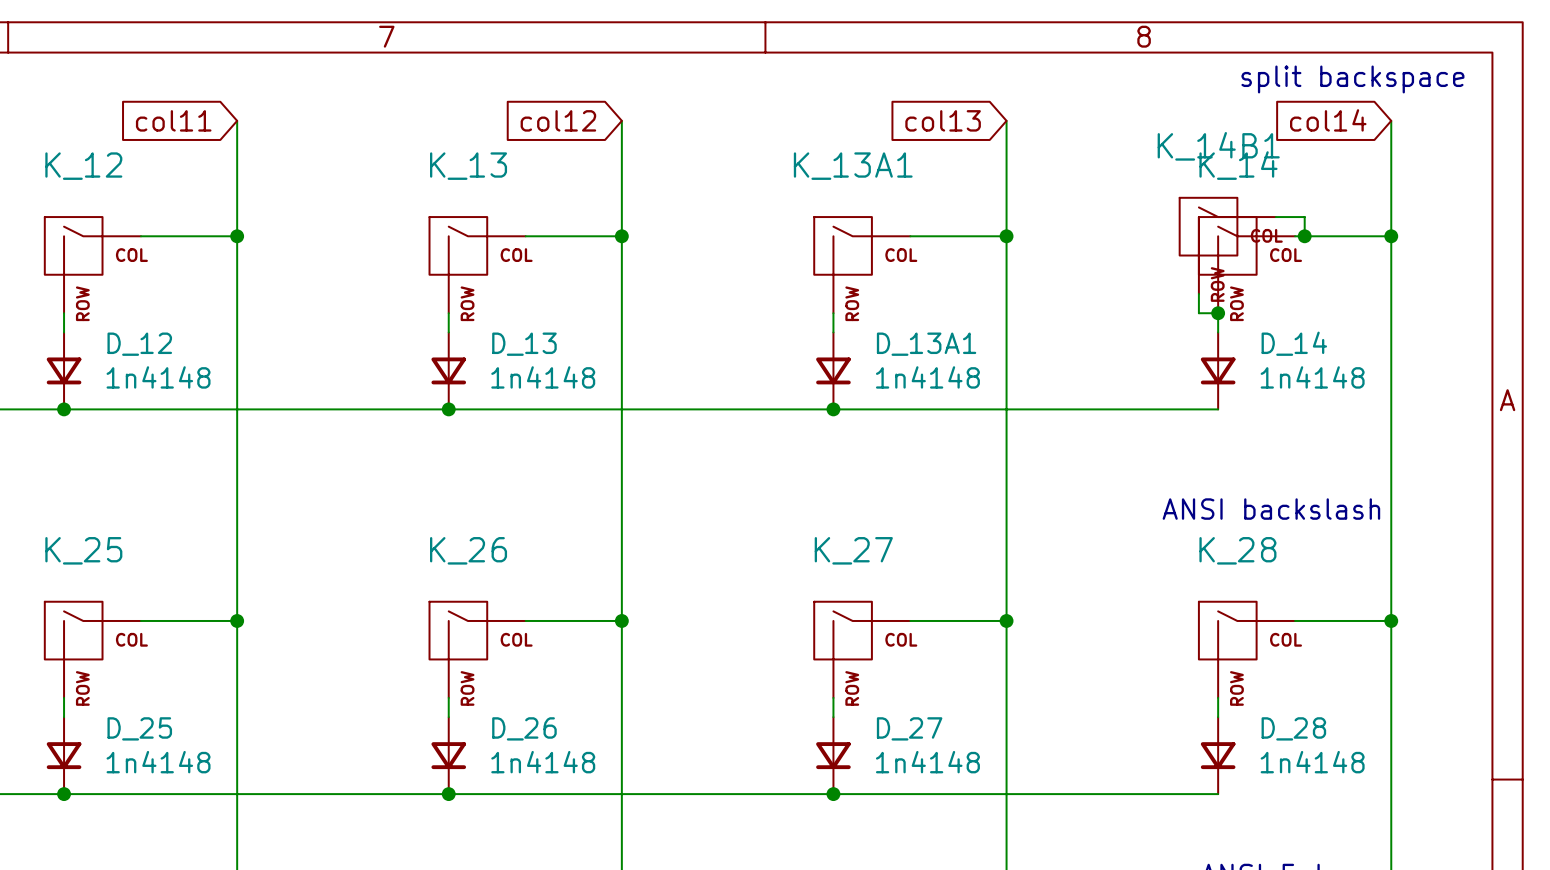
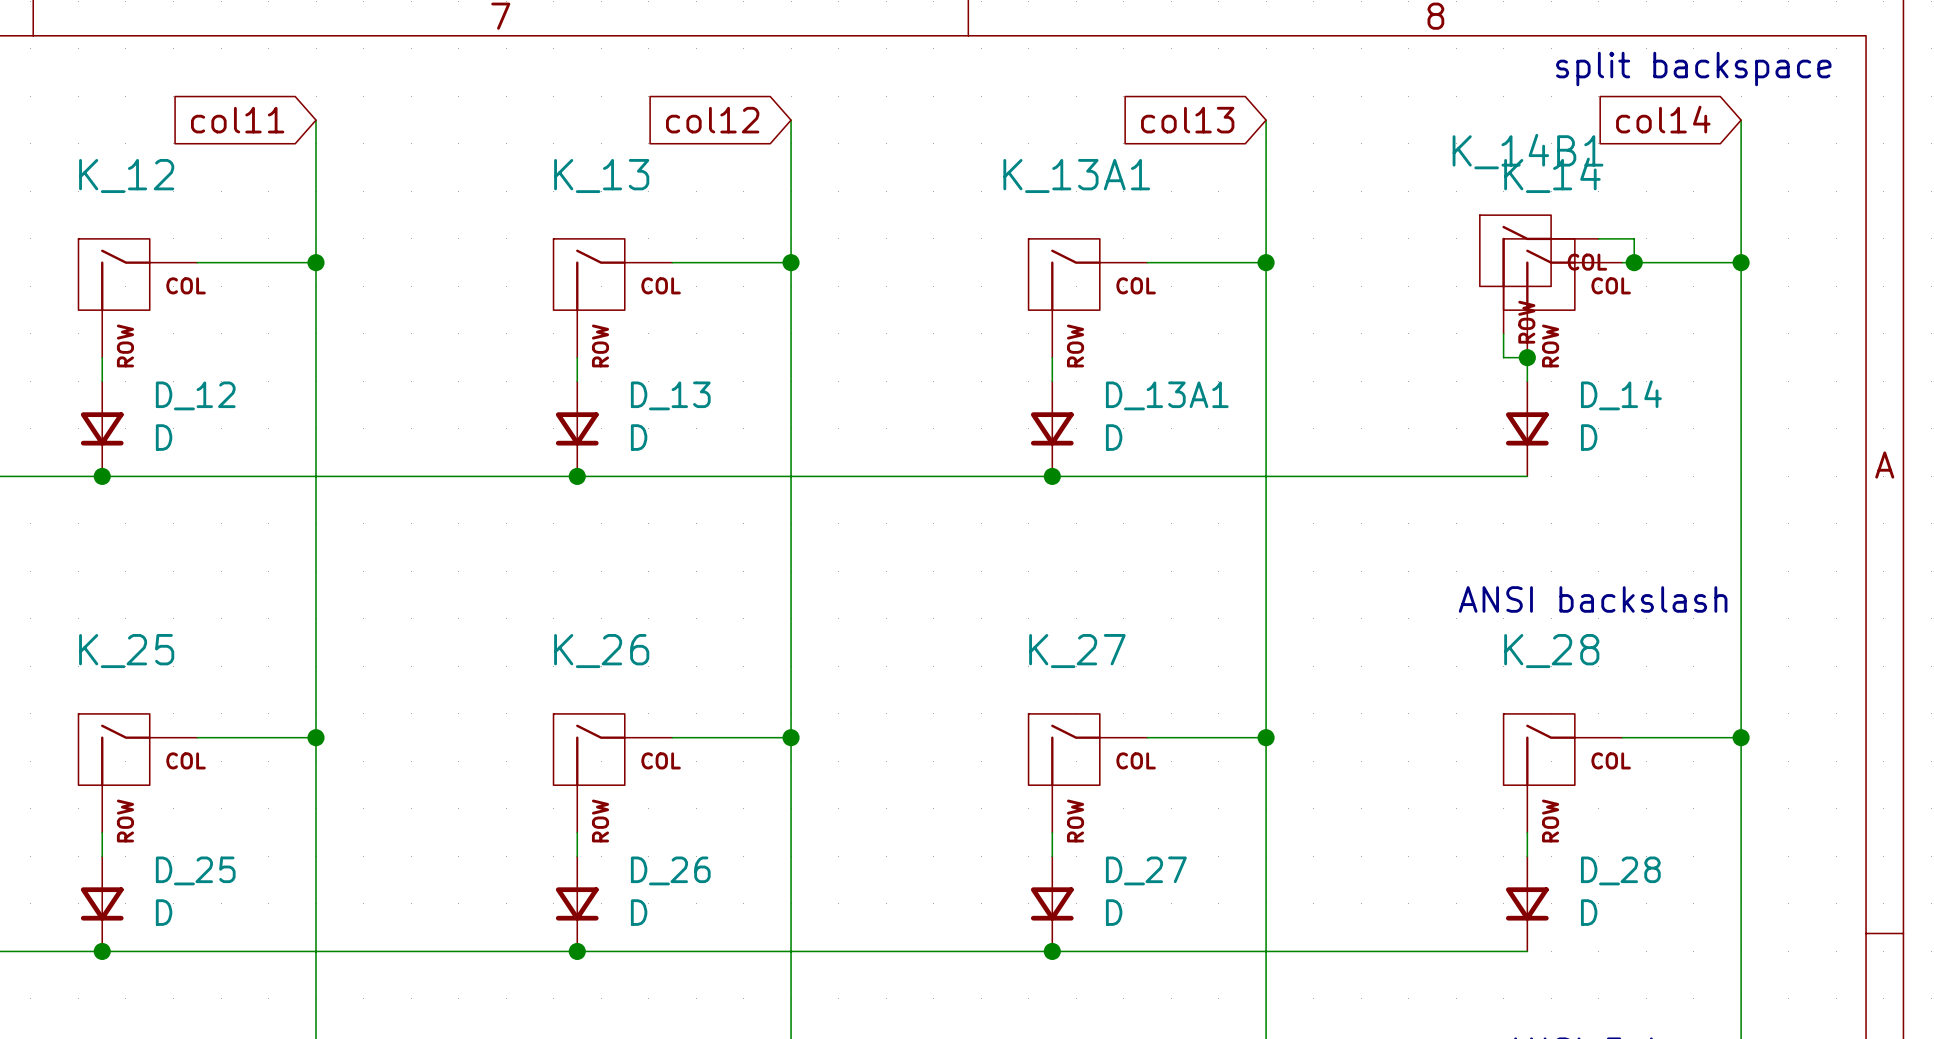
D_12 value: 1n4148 (158, 377) -> D (164, 437)
D_13 value: 1n4148 (543, 377) -> D (639, 437)
D_13A1 value: 1n4148 (927, 377) -> D (1114, 437)
D_14 value: 1n4148 (1312, 377) -> D (1589, 437)
D_25 value: 1n4148 (158, 762) -> D (164, 912)
D_26 value: 1n4148 (543, 762) -> D (639, 912)
D_27 value: 1n4148 (927, 762) -> D (1114, 912)
D_28 value: 1n4148 (1312, 762) -> D (1589, 912)

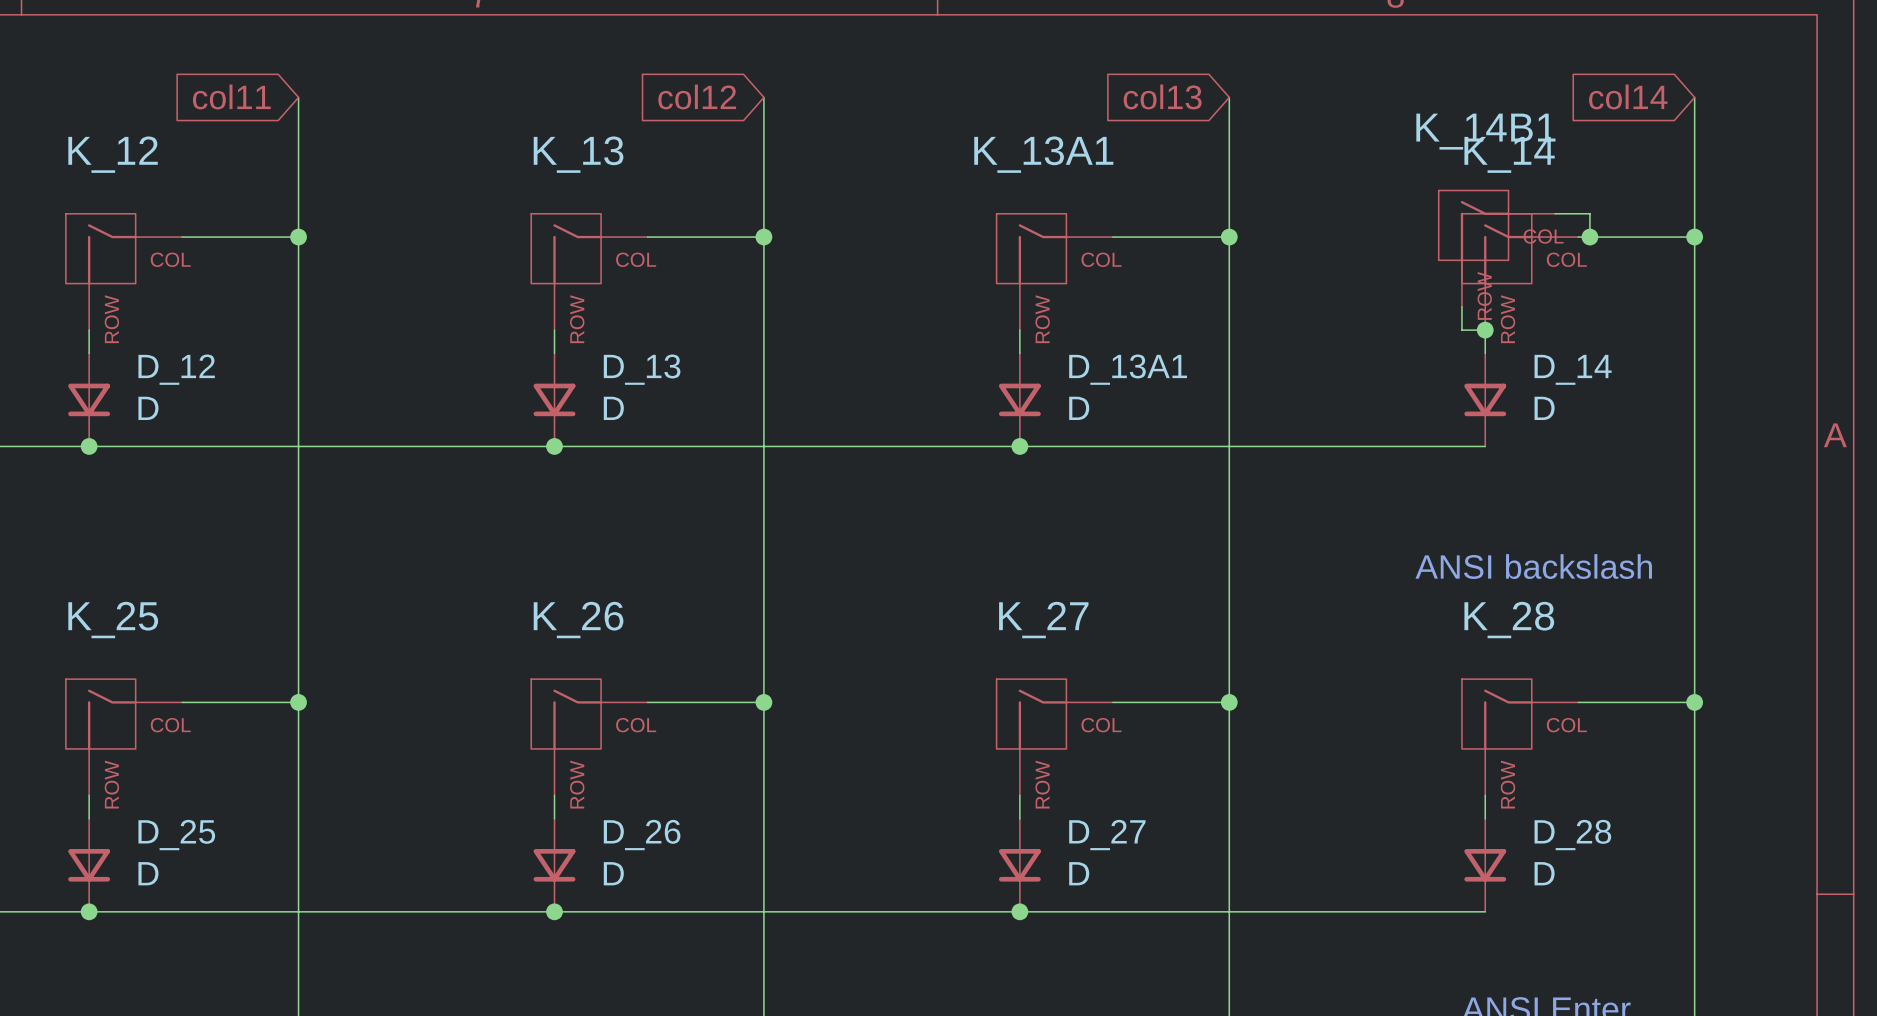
text: split backspace (1693, 69) -> none

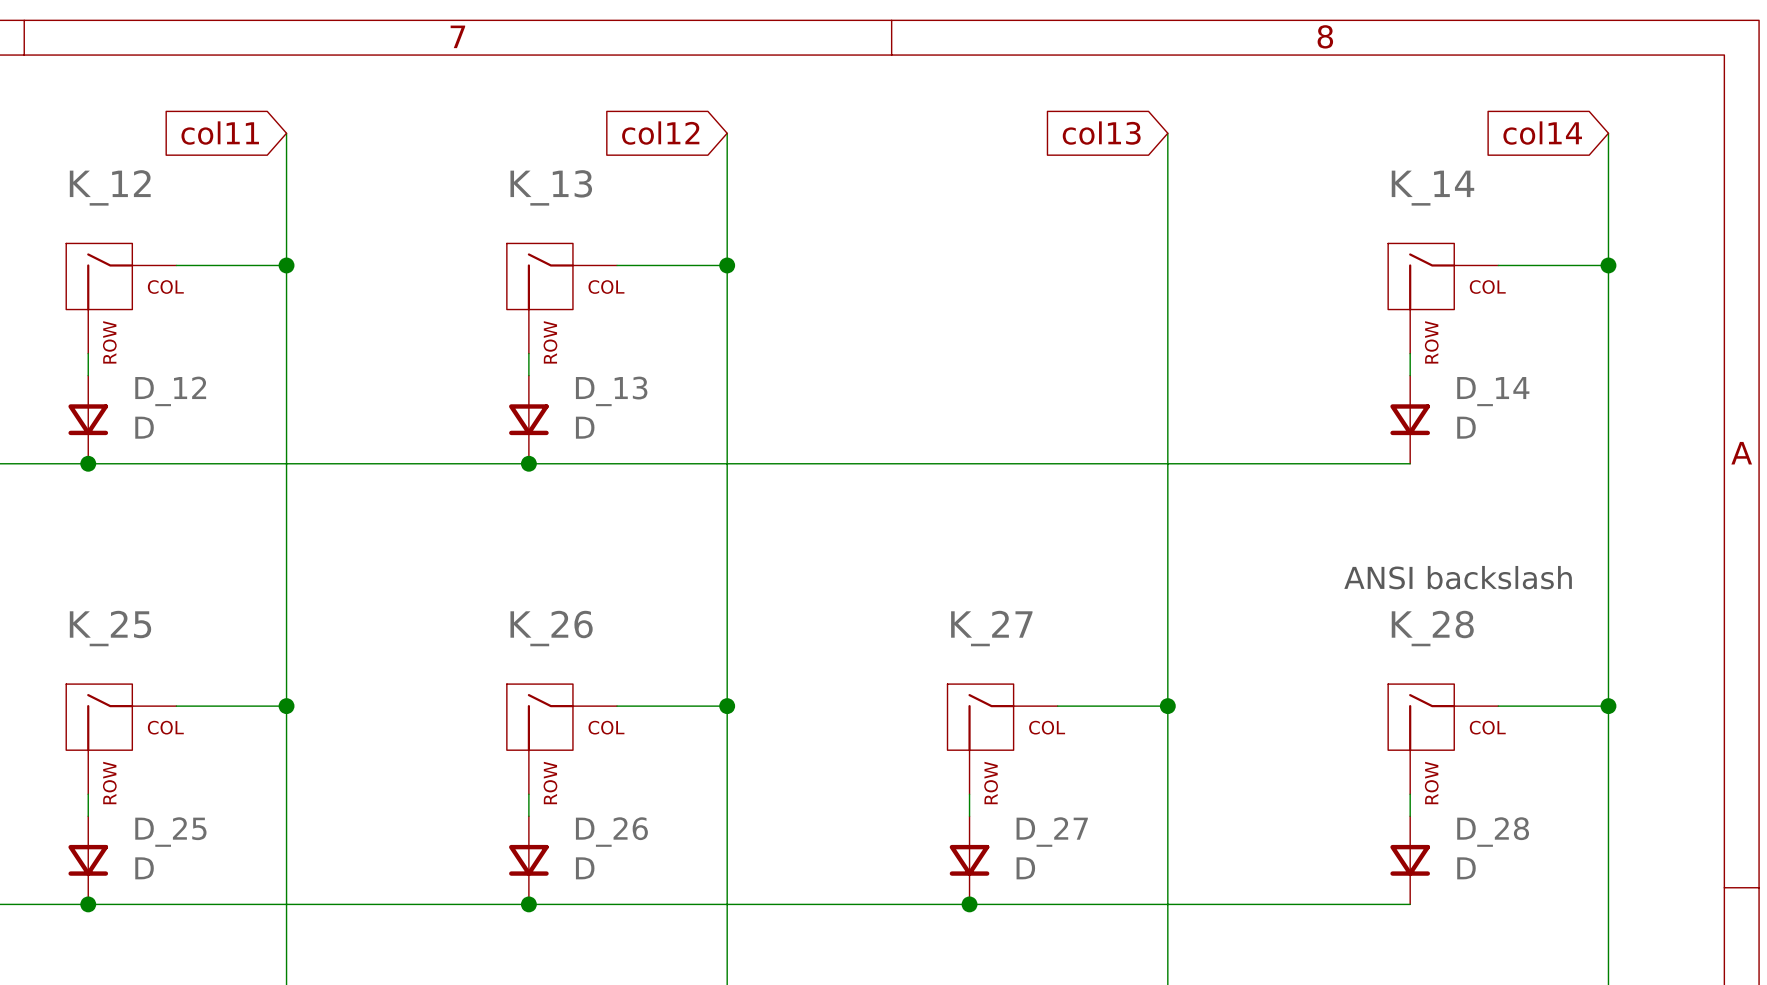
wire: (1555, 213) (1589, 213) (1589, 237) -> none
wire: (1112, 237) (1229, 237) -> none
junction: (1229, 237) -> none
junction: (1589, 237) -> none
K_14B1: (1496, 248) -> none
K_13A1: (1054, 271) -> none
wire: (1461, 306) (1461, 330) (1485, 330) -> none
wire: (1019, 330) (1019, 353) -> none
junction: (1485, 330) -> none
D_13A1: D (1019, 399) -> none
junction: (1019, 446) -> none

